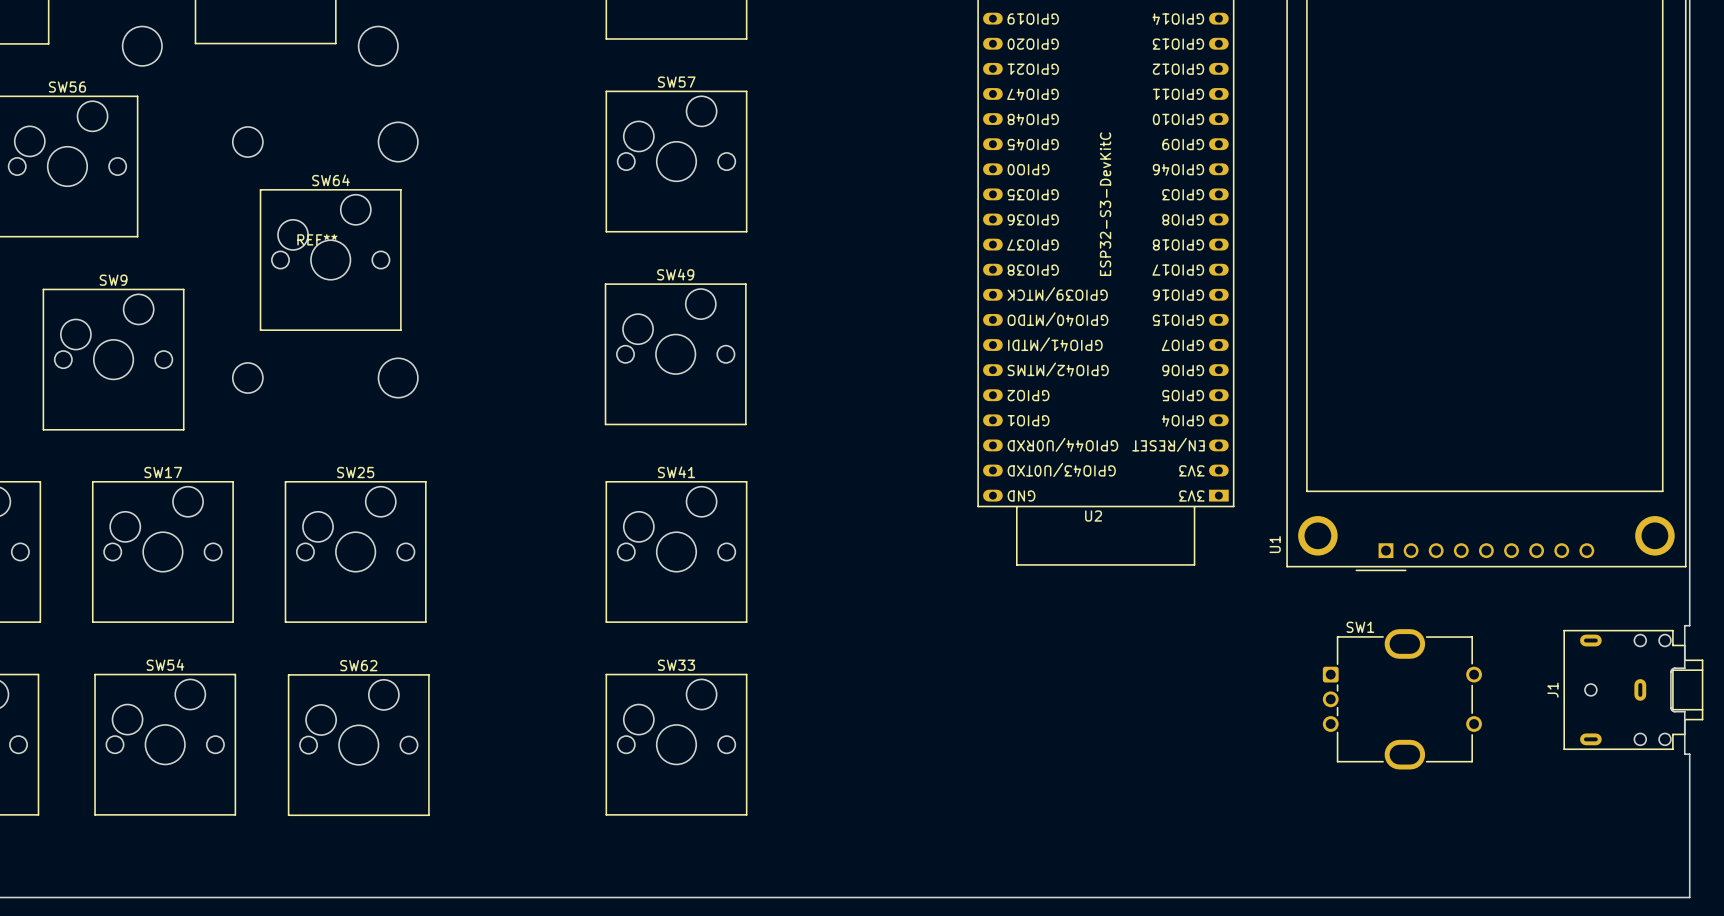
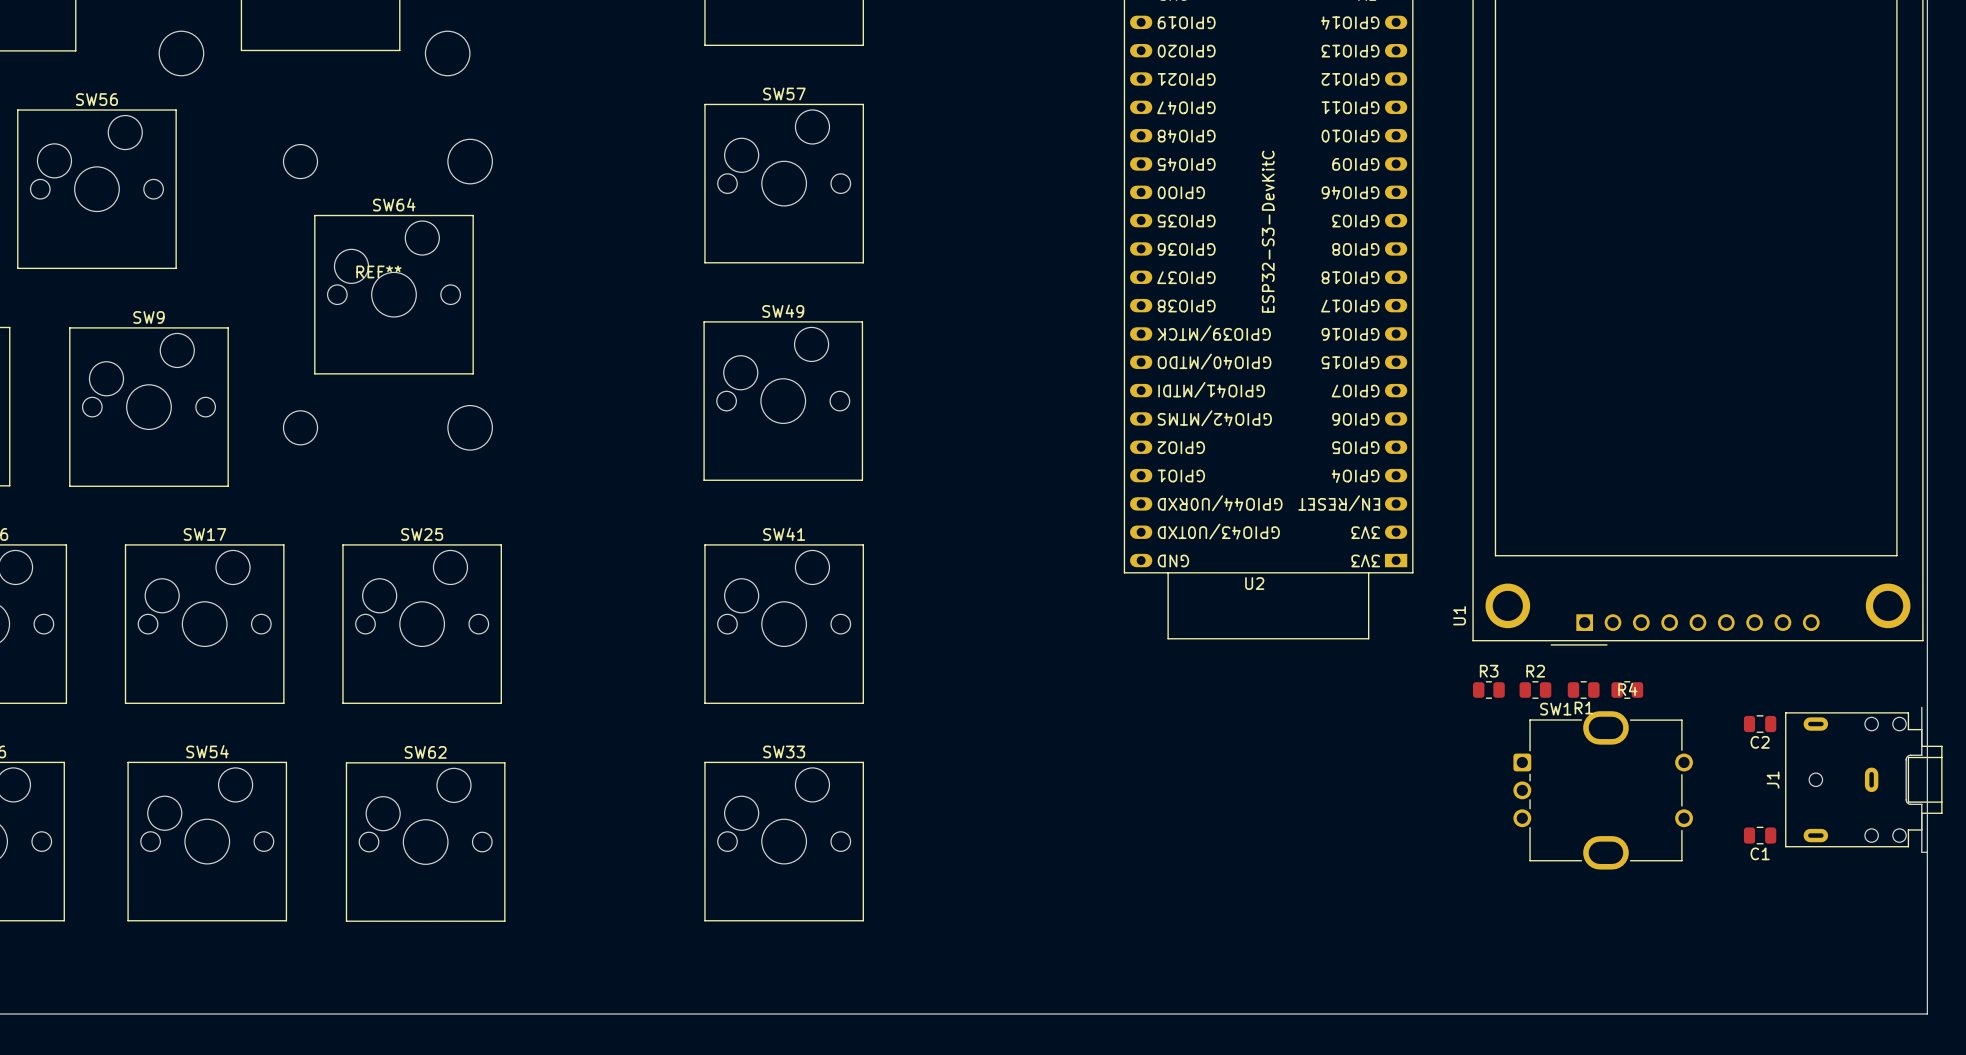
R3: none -> (1488, 690)
R2: none -> (1535, 690)
R1: none -> (1583, 690)
R4: none -> (1627, 690)
board edge: (1684, 625) (1689, 625) -> (1927, 852) (1927, 707)
C2: none -> (1760, 724)
C1: none -> (1760, 835)

